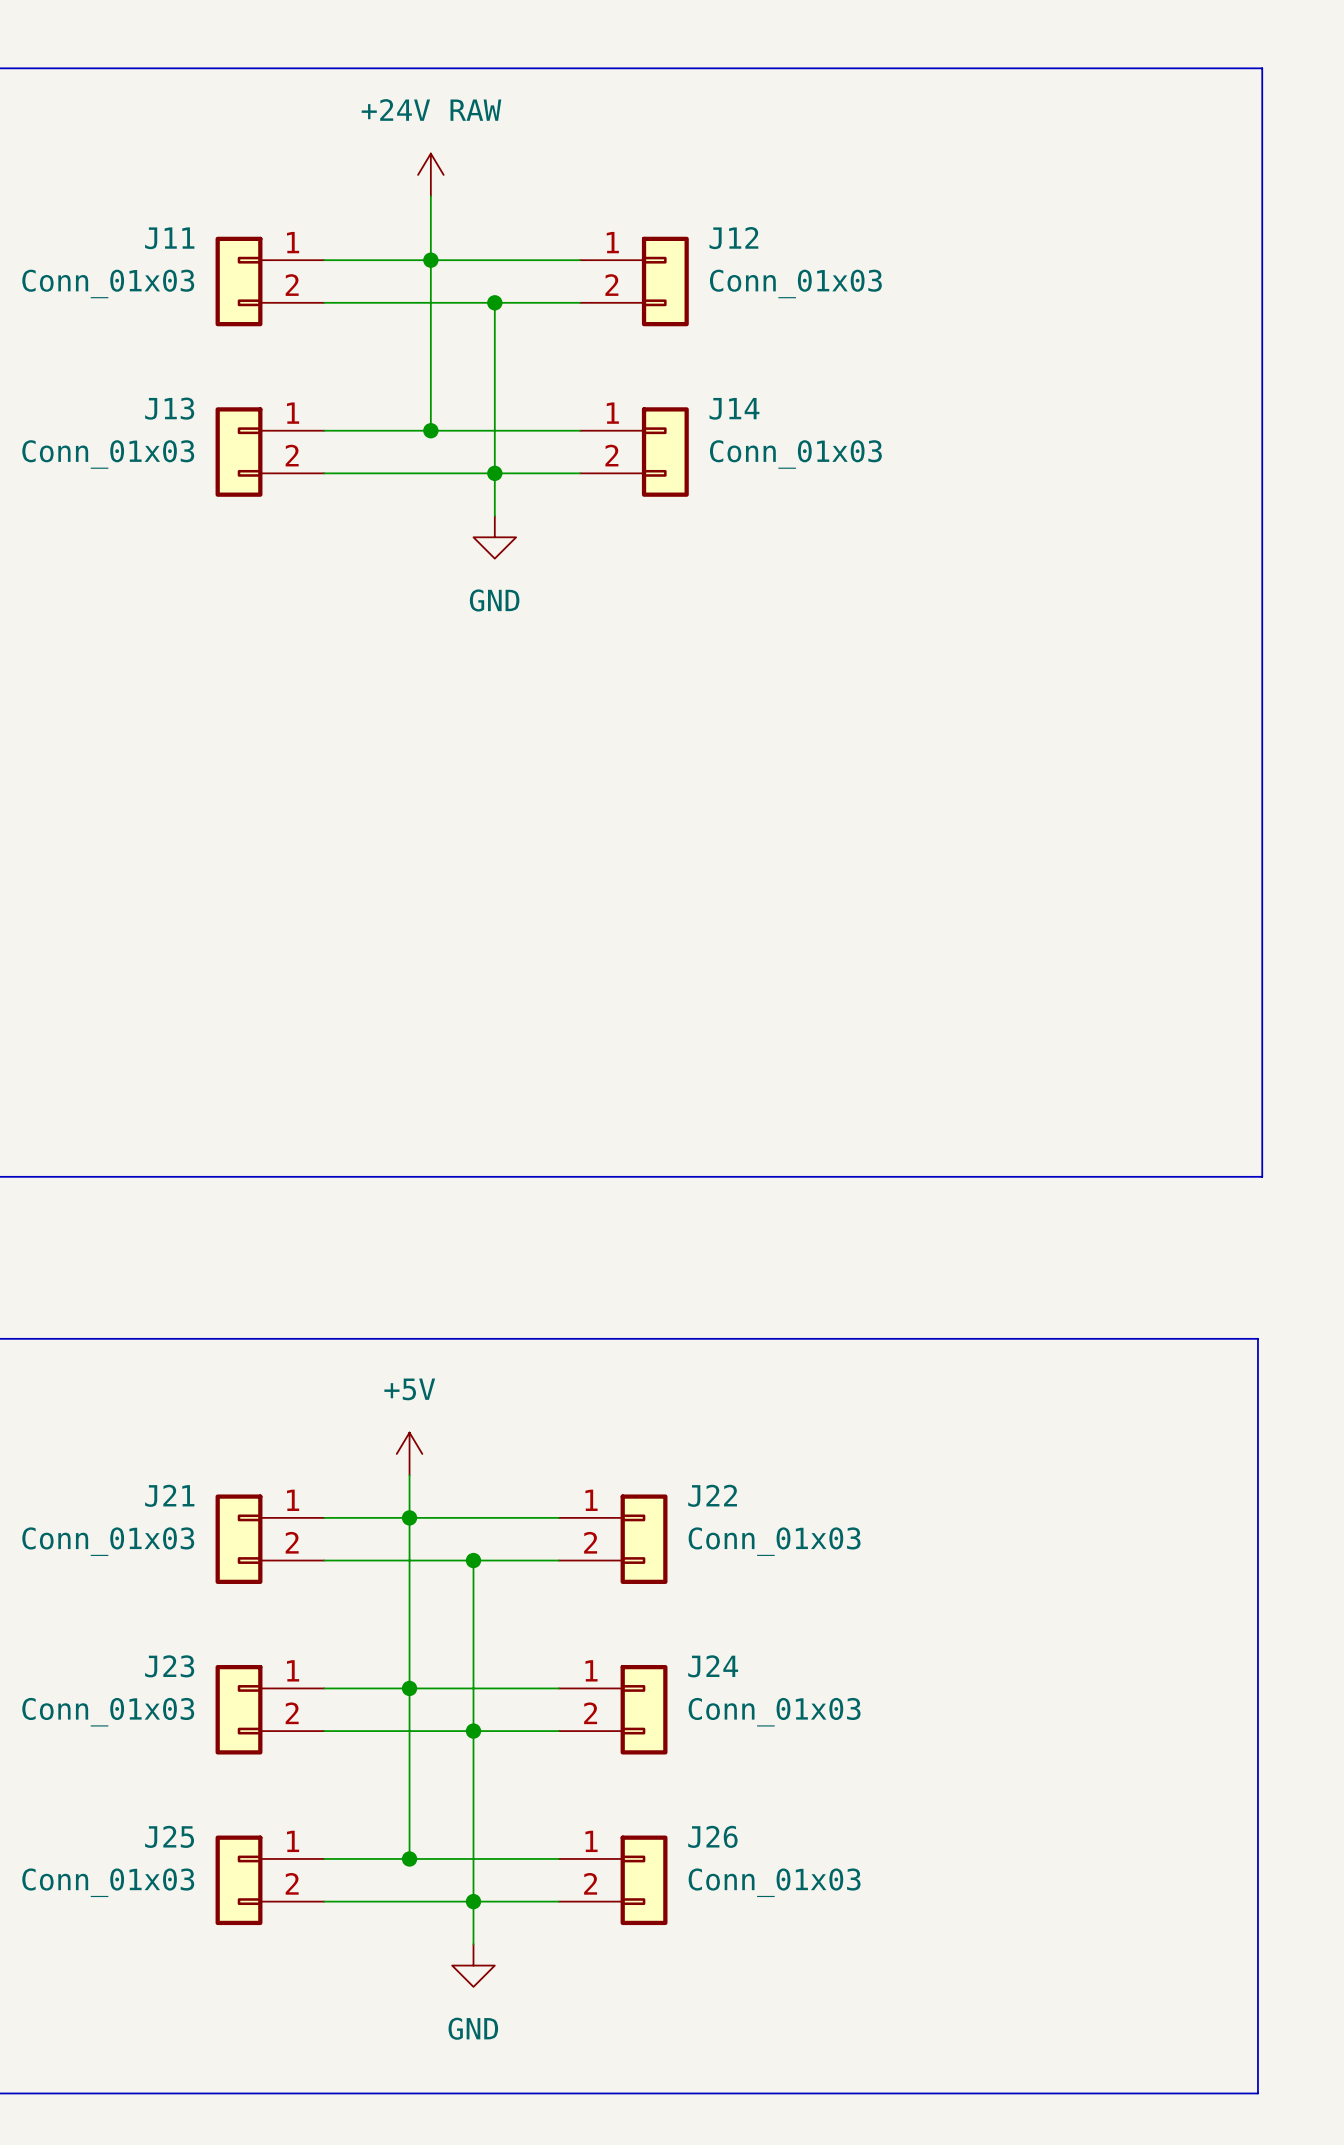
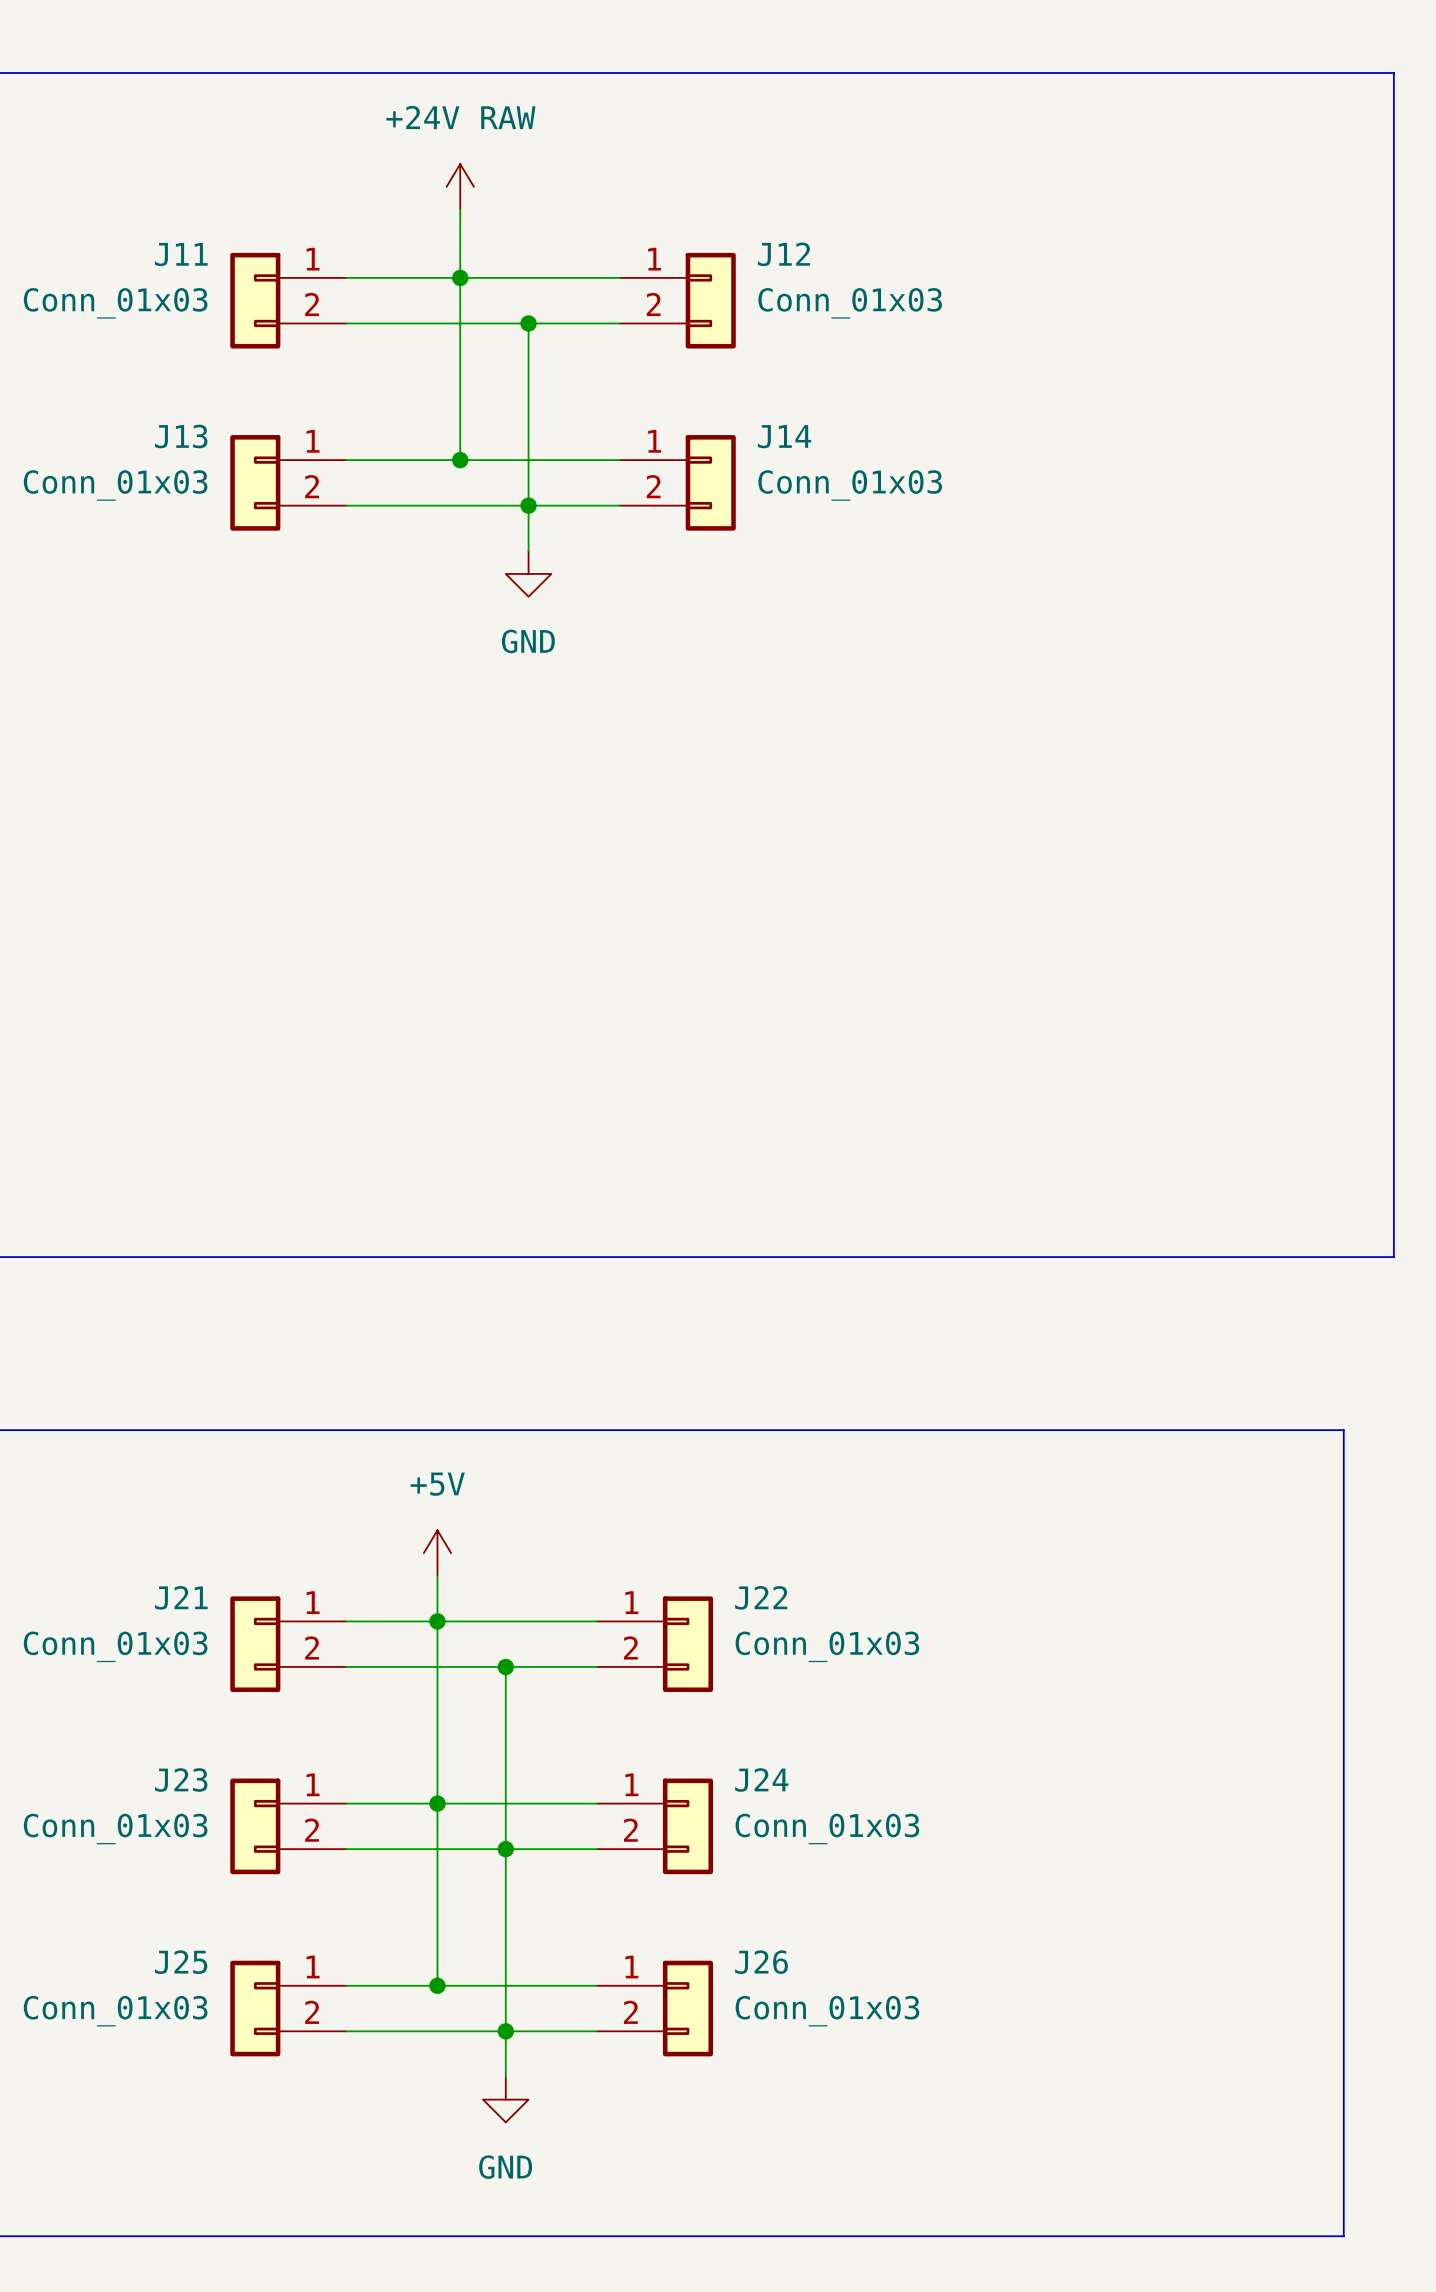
line: (1262, 68) (1262, 1176) -> (1348, 72) (1393, 72) (1393, 1257) (1348, 1257)

